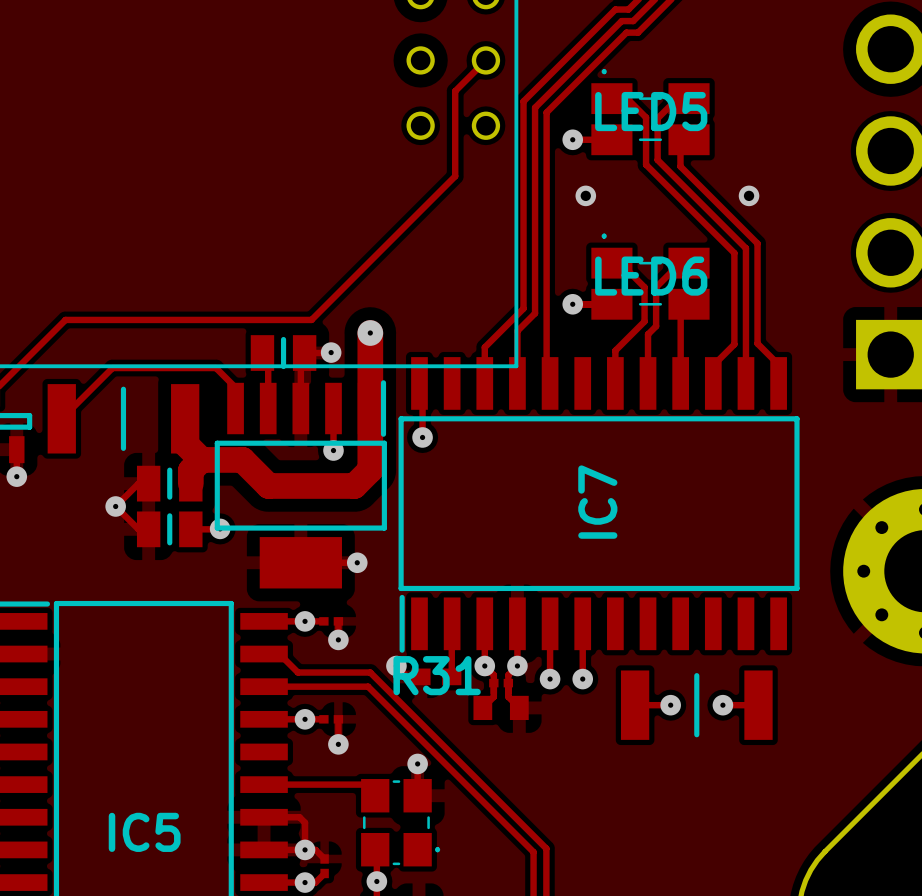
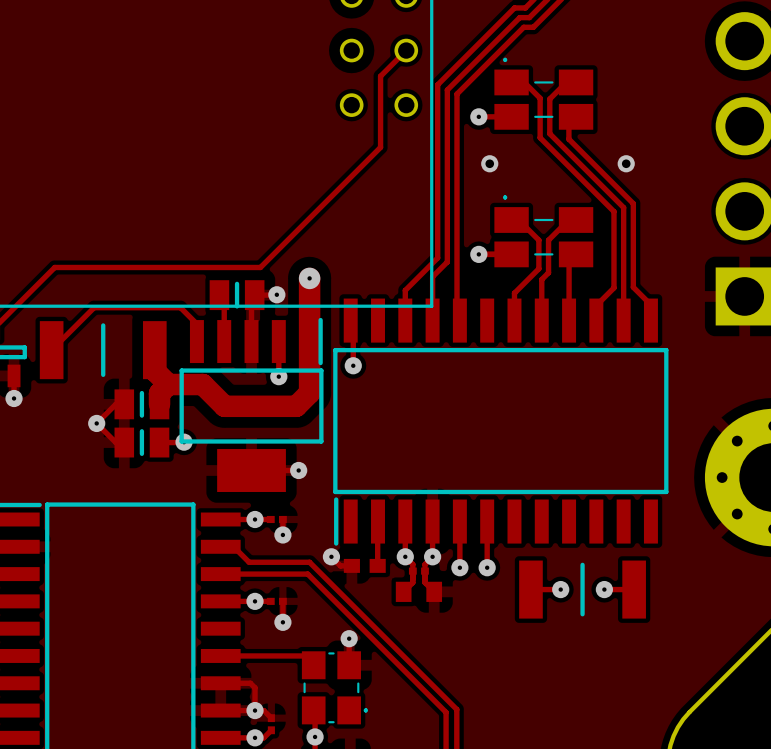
LED5 name: LED5 (651, 111) -> none
LED6 name: LED6 (651, 276) -> none
IC7 name: IC7 (597, 502) -> none
R31 name: R31 (437, 675) -> none
IC5 name: IC5 (144, 832) -> none

